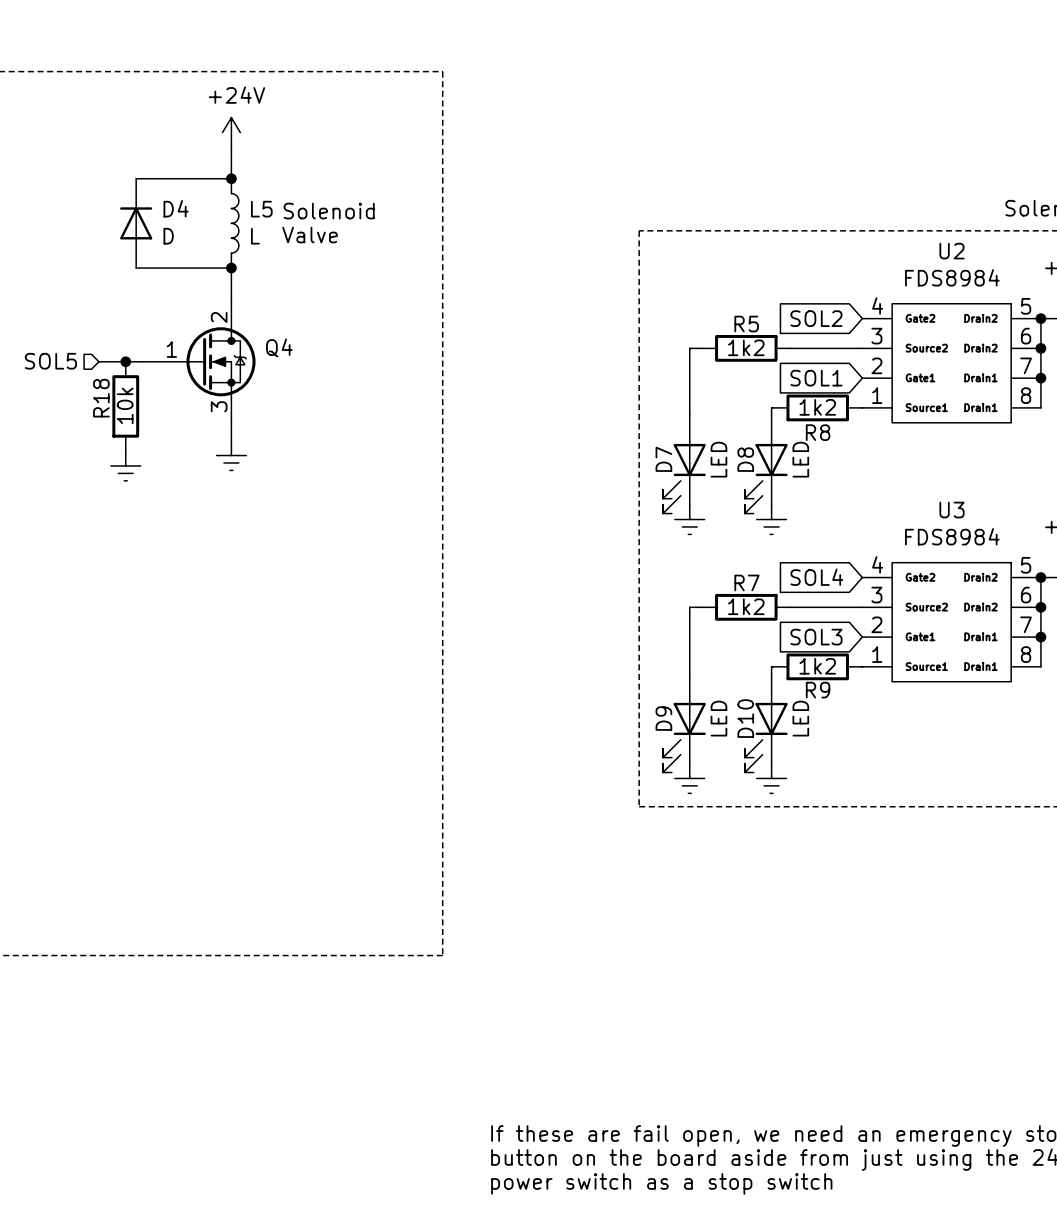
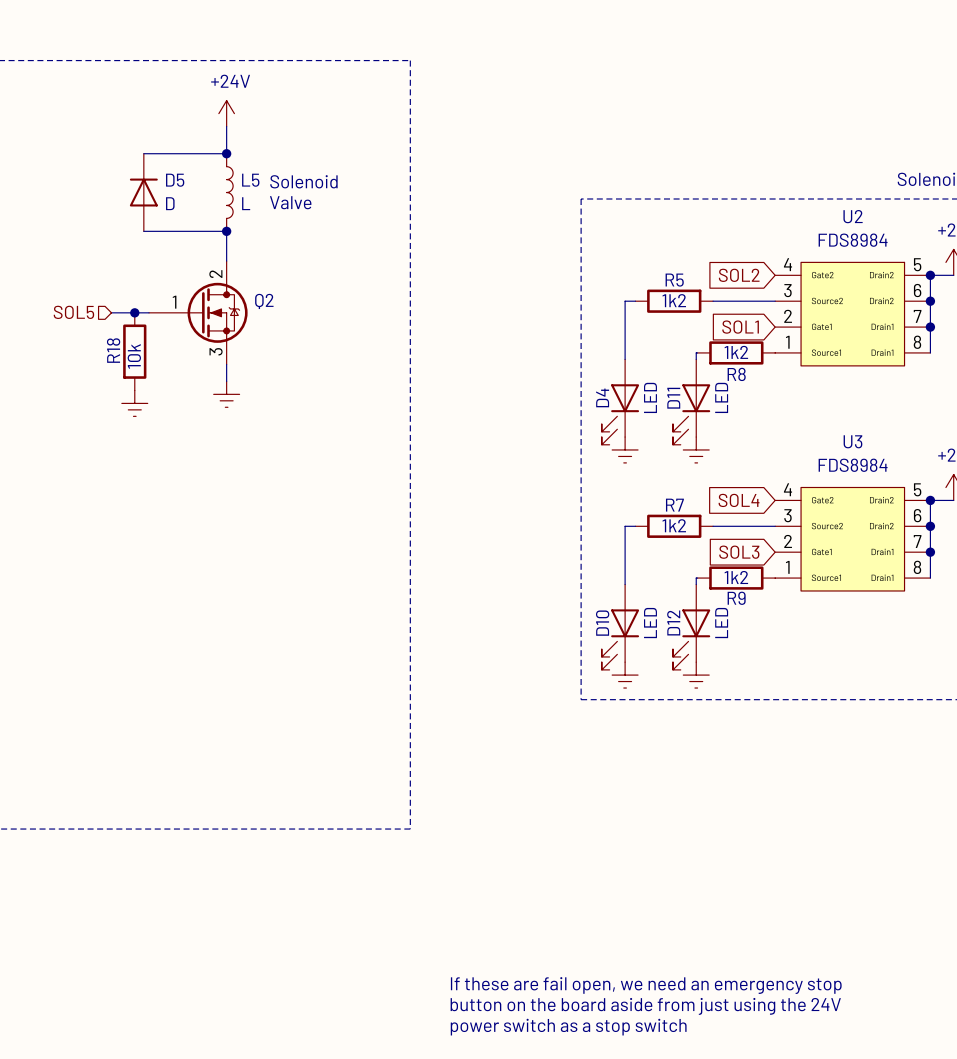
D4 name: D4 (176, 208) -> D5 (175, 180)
Q4 name: Q4 (279, 347) -> Q2 (264, 301)
D7 name: D7 (663, 459) -> D4 (602, 397)
D8 name: D8 (745, 459) -> D11 (673, 398)
D9 name: D9 (663, 718) -> D10 (602, 623)
D10 name: D10 (745, 718) -> D12 (673, 623)

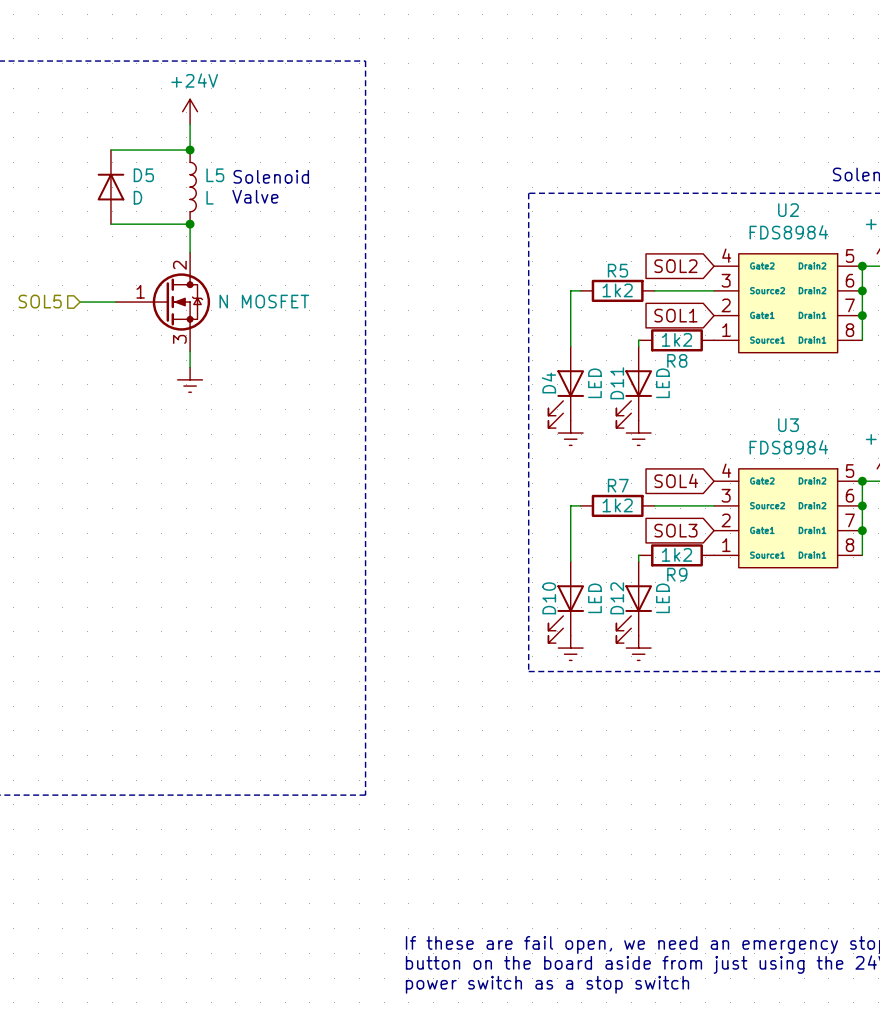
Q2 name: Q2 (264, 301) -> none
junction: (134, 312) -> none
Q2 value: none -> N MOSFET (264, 301)
R18: 10k (134, 351) -> none
power symbol: (134, 403) -> none

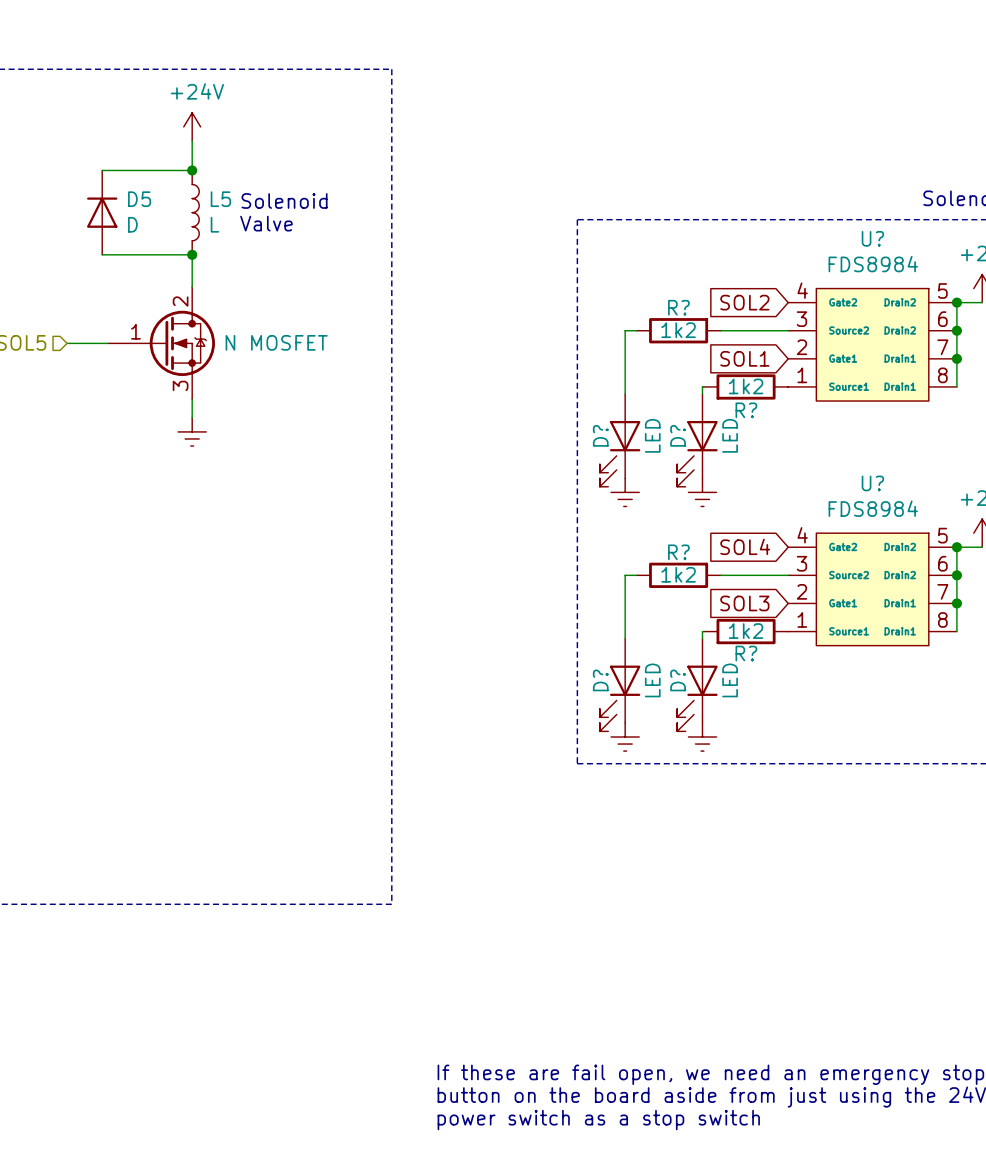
U2 name: U2 (788, 210) -> U? (872, 238)
R5 name: R5 (617, 270) -> R? (678, 307)
R8 name: R8 (677, 360) -> R? (746, 410)
D4 name: D4 (548, 382) -> D? (600, 435)
D11 name: D11 (617, 383) -> D? (678, 435)
U3 name: U3 (788, 425) -> U? (872, 483)
R7 name: R7 (618, 485) -> R? (678, 552)
R9 name: R9 (677, 574) -> R? (746, 653)
D10 name: D10 (549, 598) -> D? (600, 680)
D12 name: D12 (617, 598) -> D? (678, 680)

